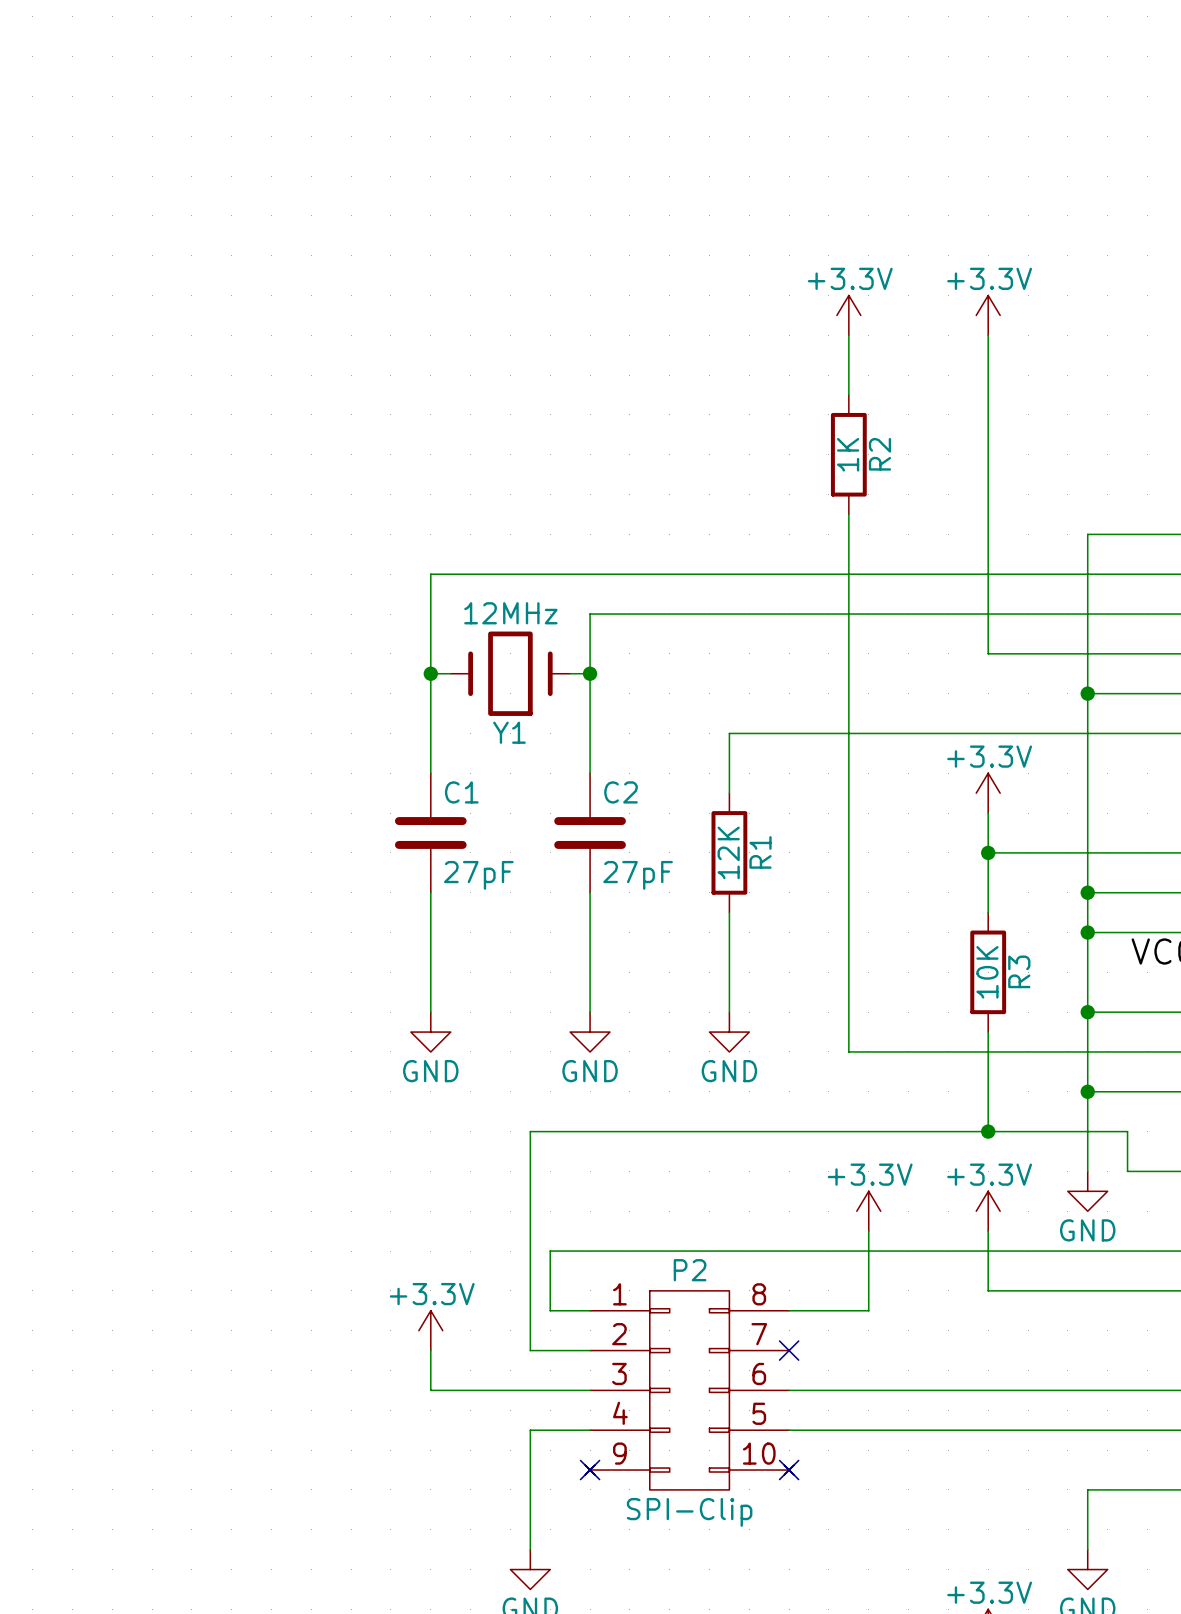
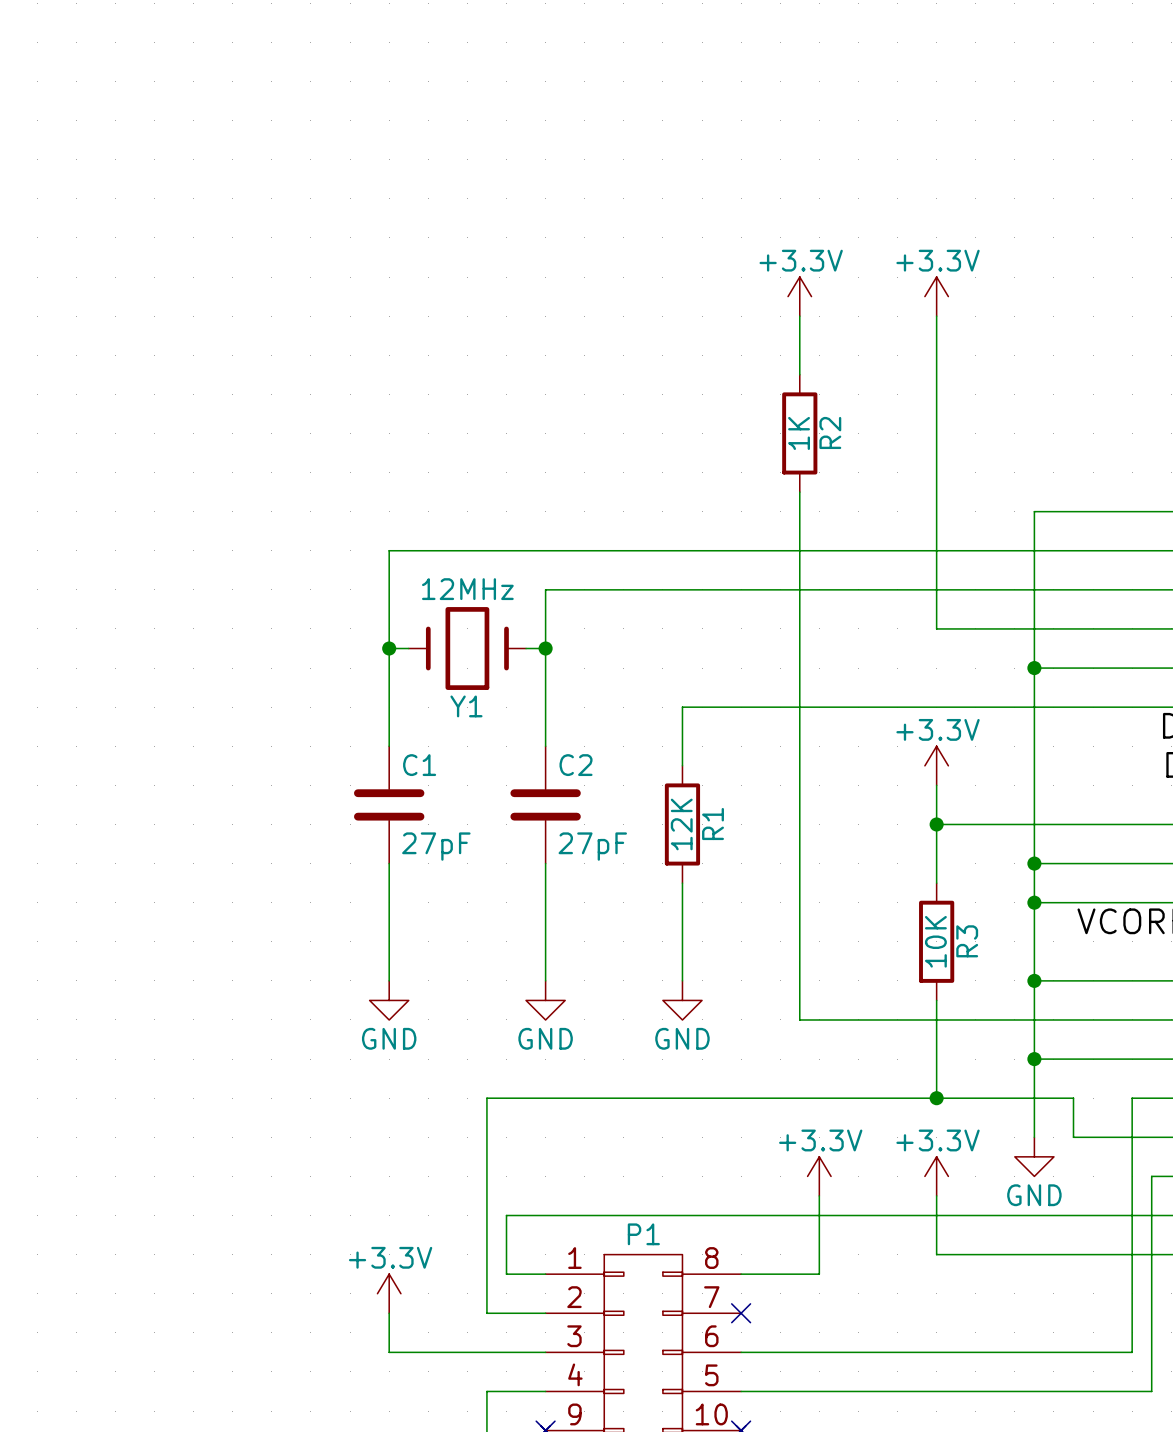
P2 name: P2 (690, 1270) -> P1 (643, 1234)

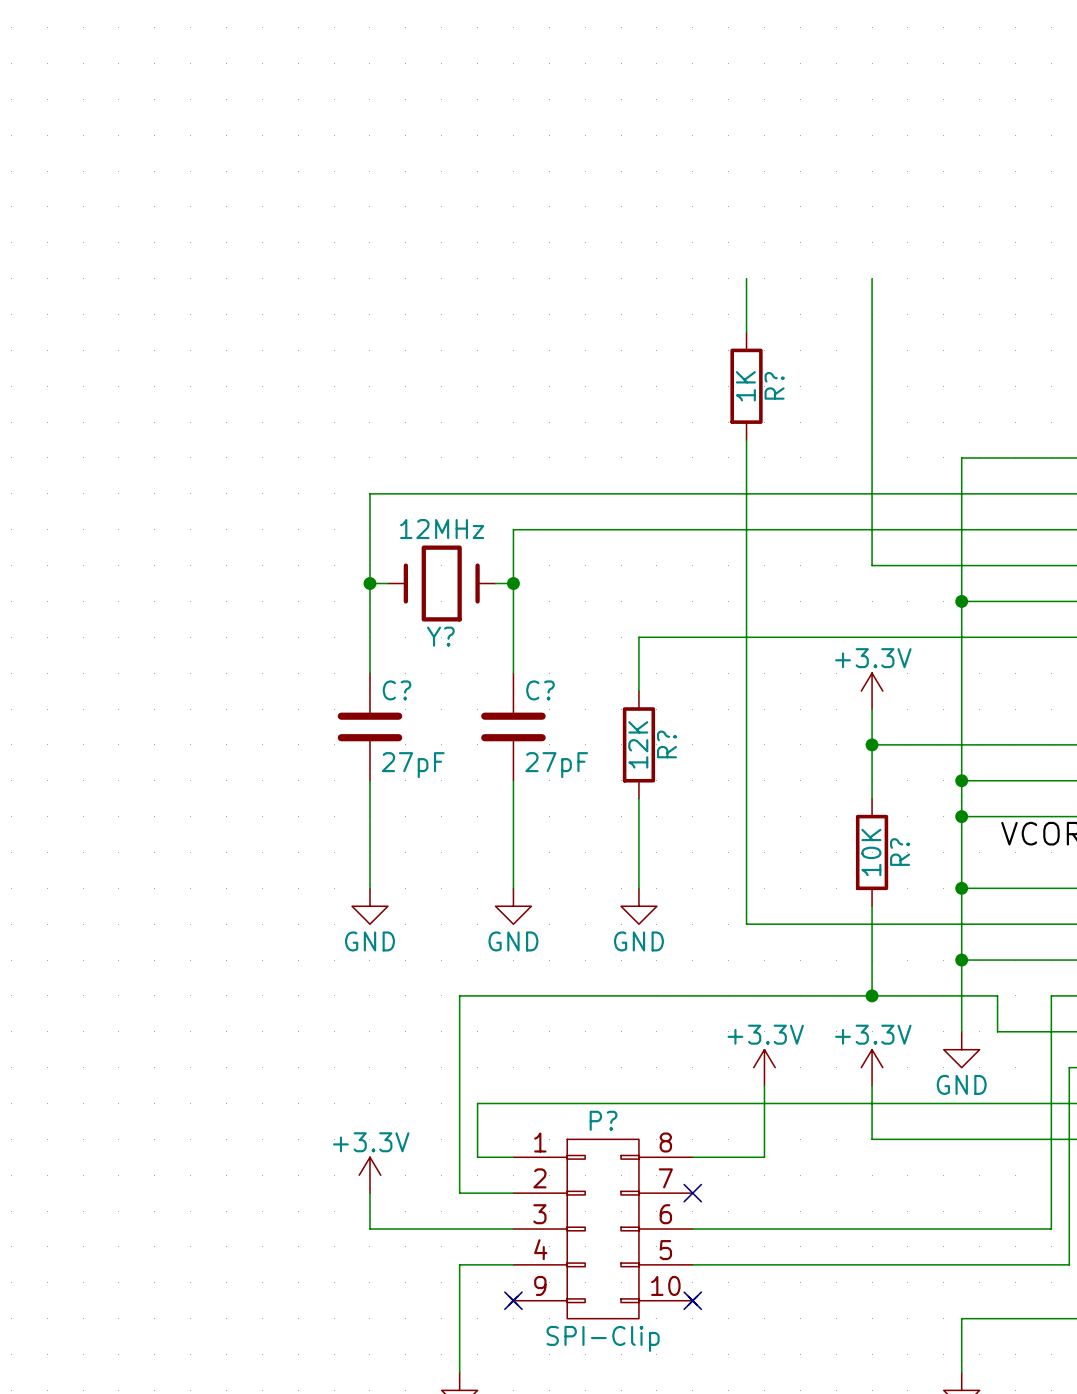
power symbol: +3.3V (799, 296) -> none
power symbol: +3.3V (936, 296) -> none
R2 name: R2 (830, 432) -> R? (774, 385)
Y1 name: Y1 (466, 706) -> Y? (440, 636)
C1 name: C1 (419, 765) -> C? (397, 690)
C2 name: C2 (576, 765) -> C? (540, 690)
R1 name: R1 (713, 824) -> R? (666, 744)
R3 name: R3 (967, 941) -> R? (900, 852)
P1 name: P1 (643, 1234) -> P? (603, 1120)

